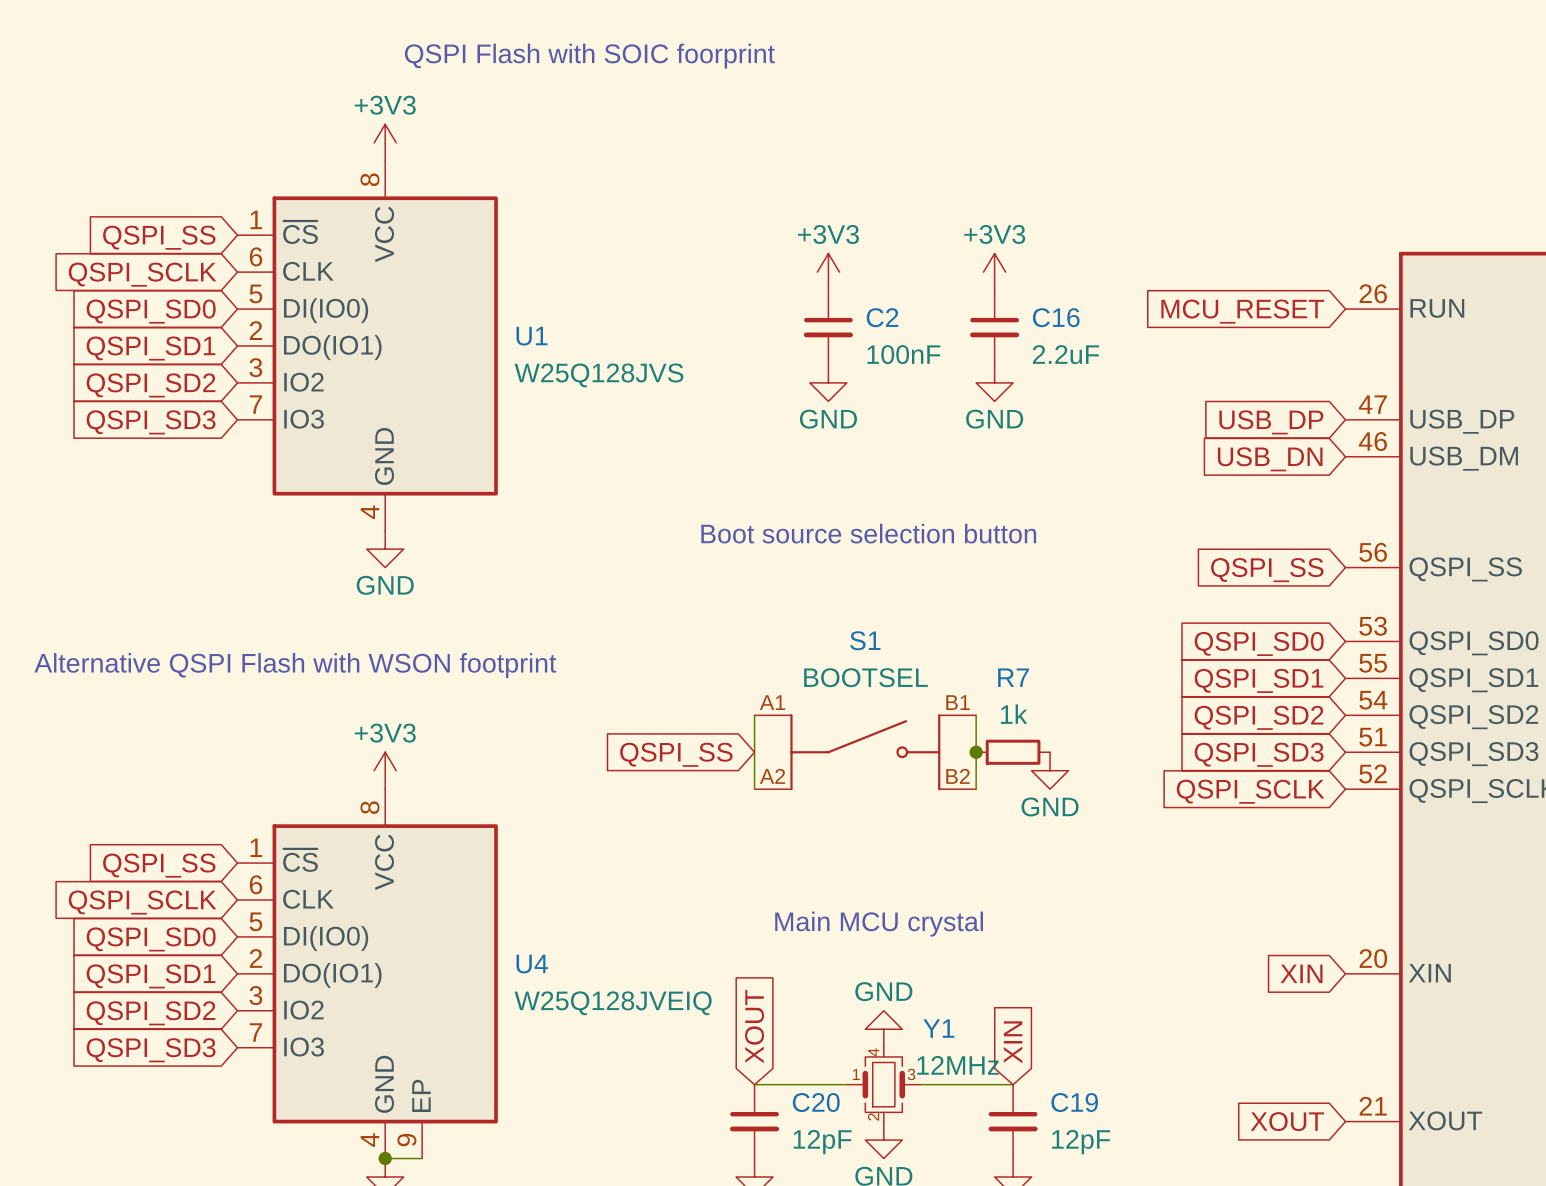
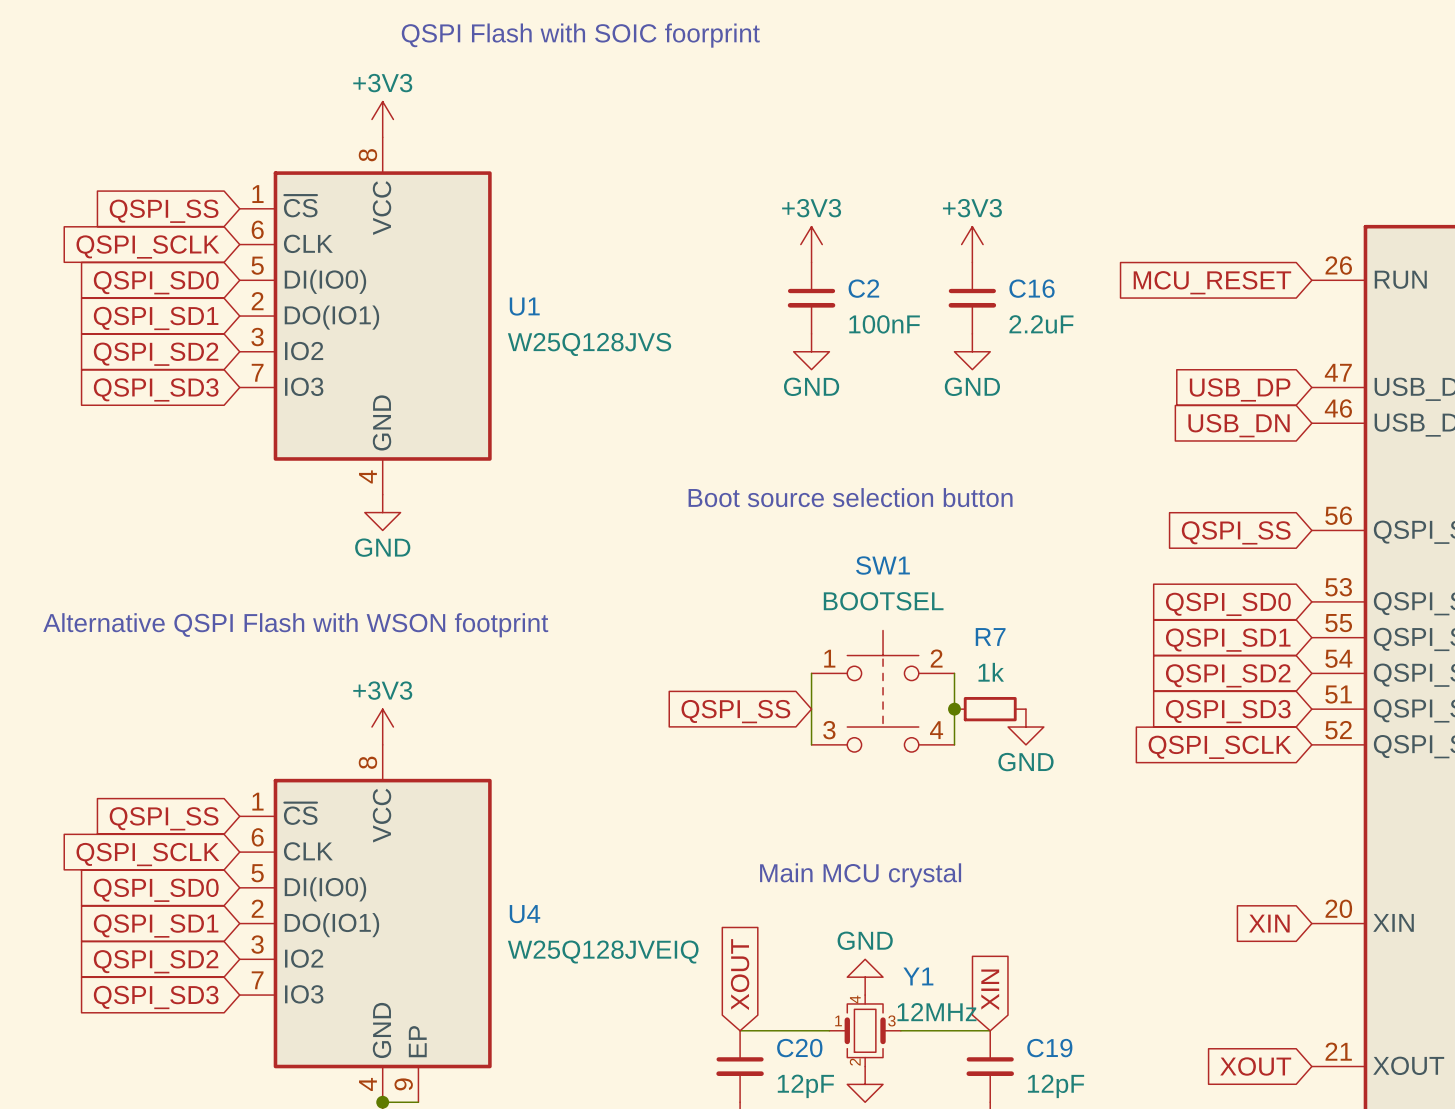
wire: (754, 715) (754, 789) -> (811, 673) (811, 744)
SW1: none -> BOOTSEL (883, 691)
S1: BOOTSEL (865, 752) -> none
global label position: QSPI_SS (676, 754) -> QSPI_SS (735, 711)

